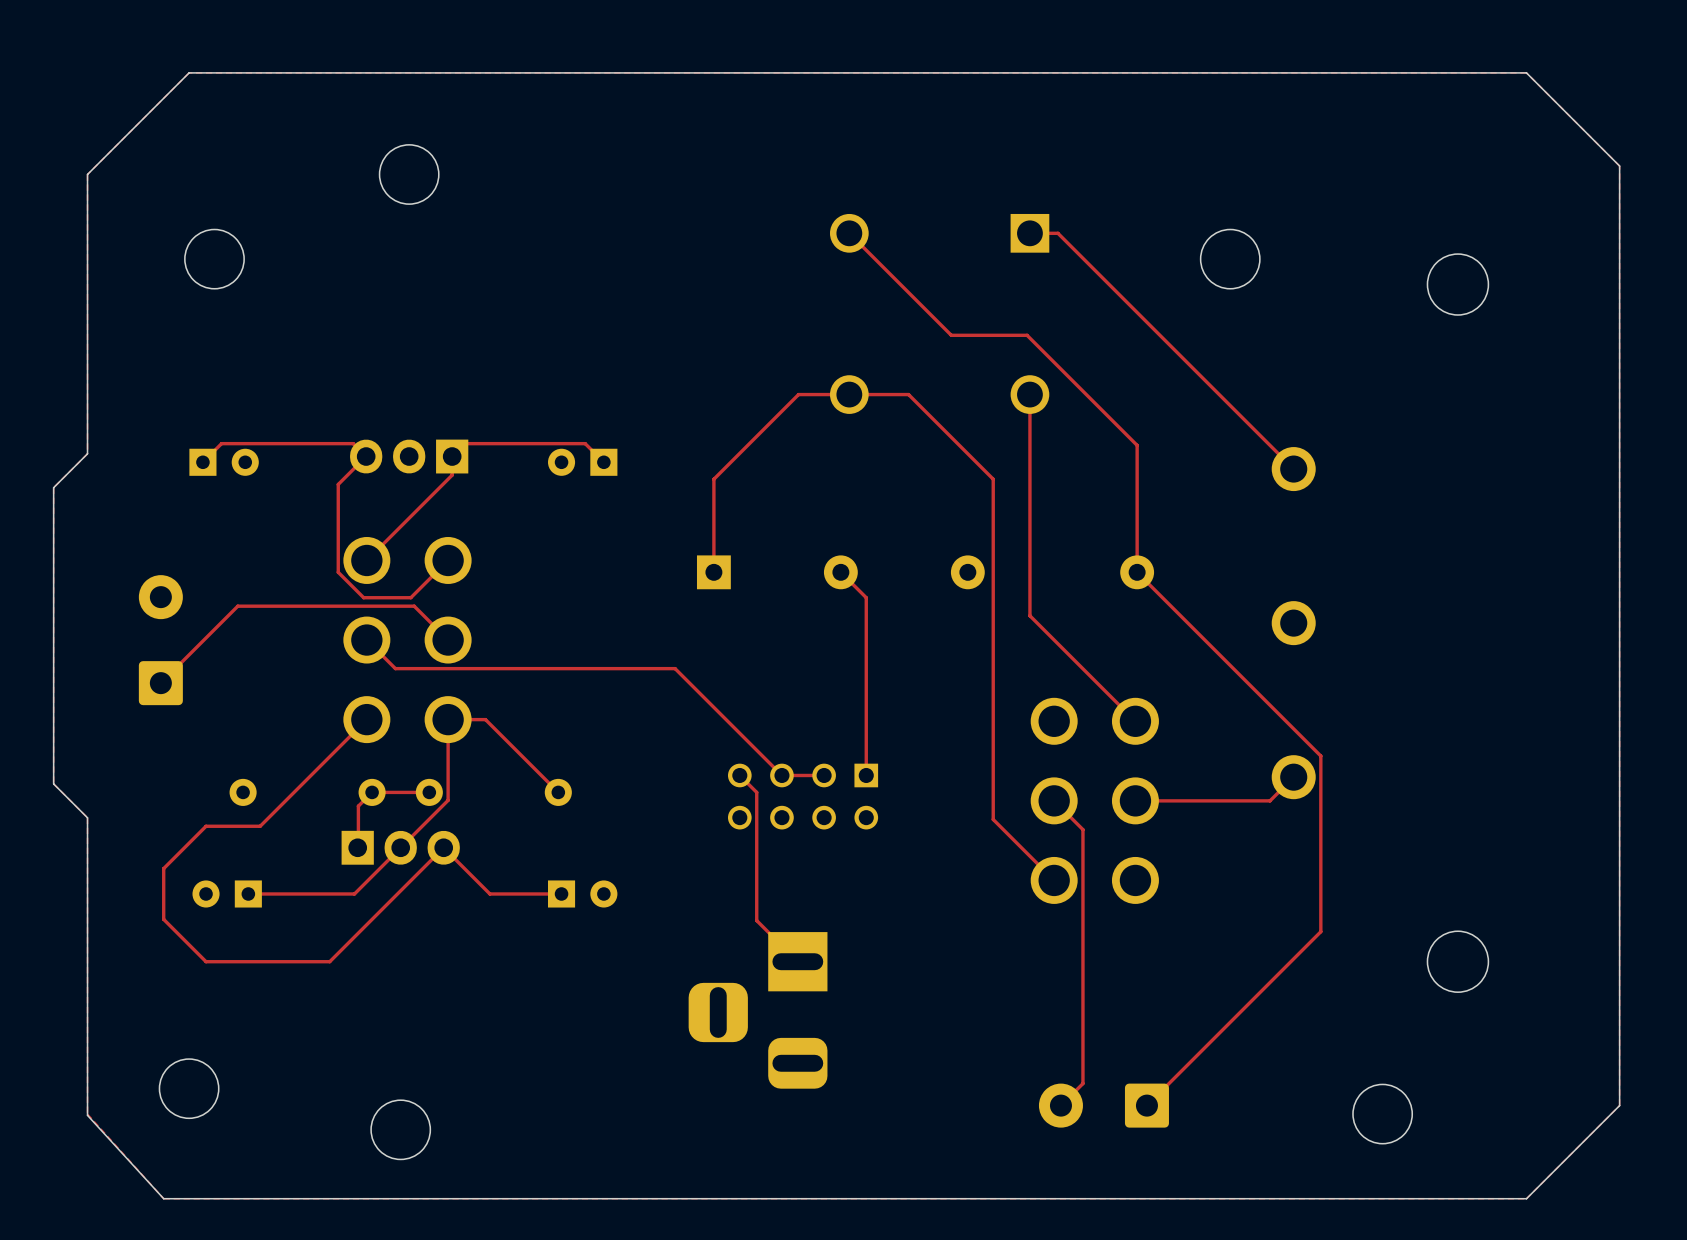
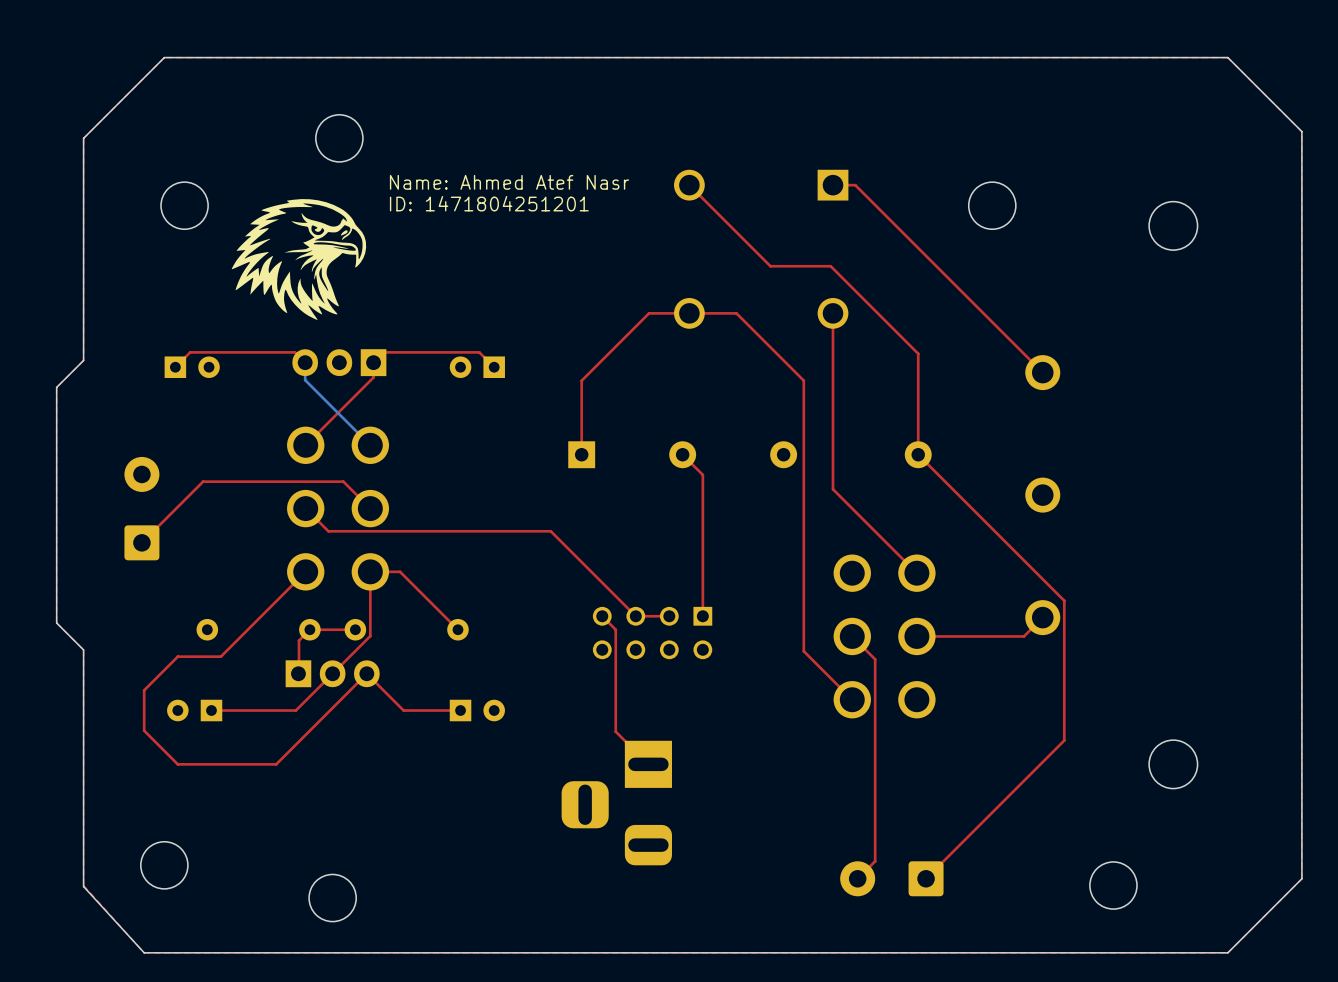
text: none -> Name: Ahmed Atef Nasr (509, 182)
drawing: none -> [231, 199, 367, 321]
text: none -> ID: 1471804251201 (489, 203)
top track: (366, 456) (338, 484) (338, 572) (363, 597) (410, 597) (448, 560) -> none
bottom track: none -> (305, 362) (305, 380) (370, 445)

